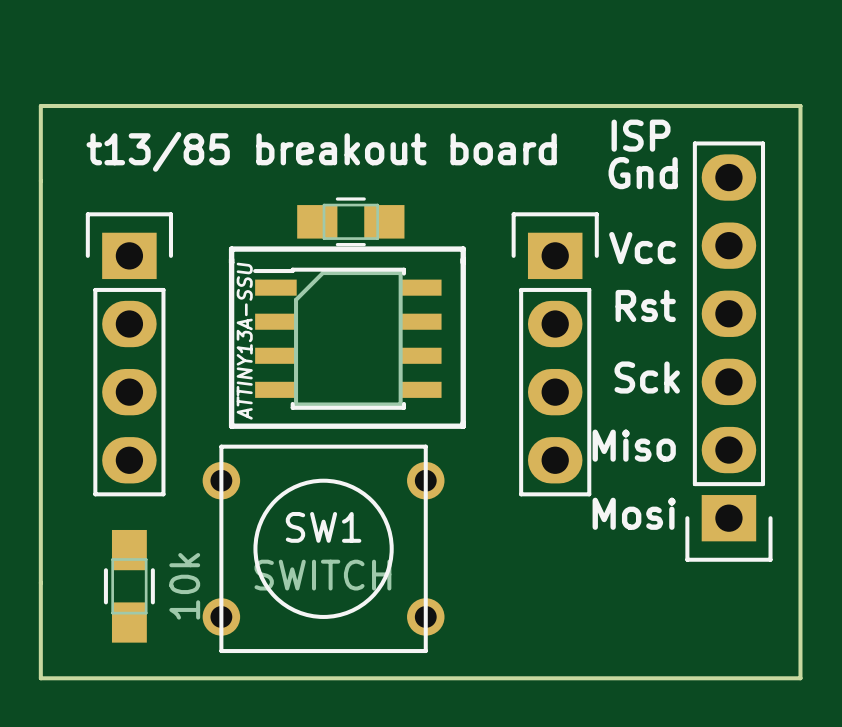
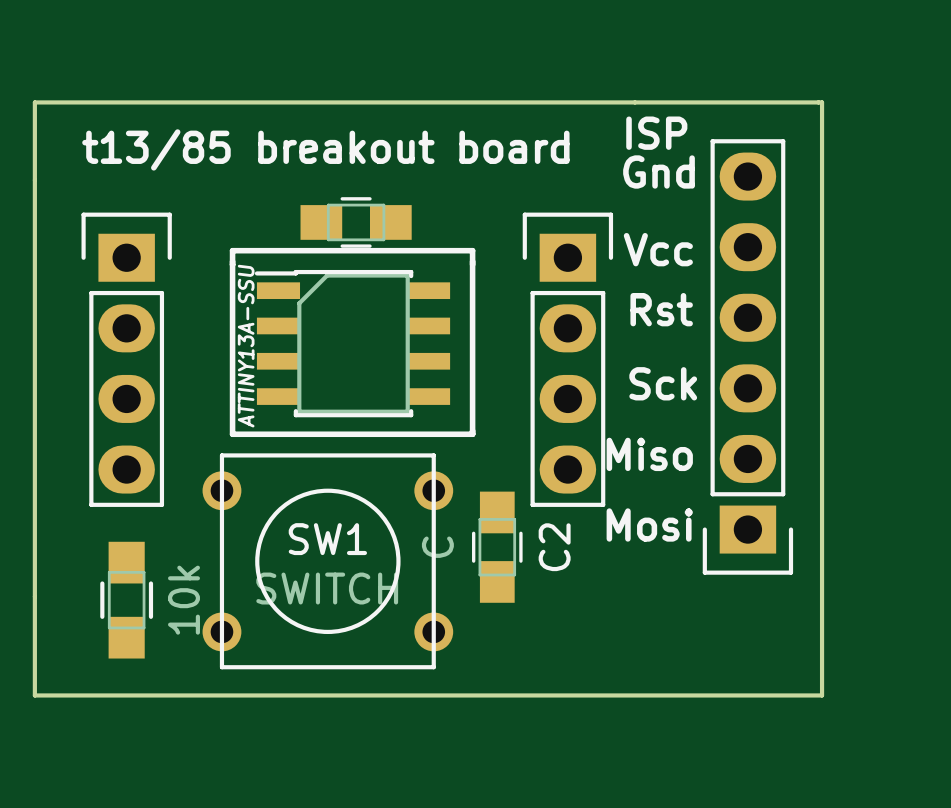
C2: none -> C (497, 547)

